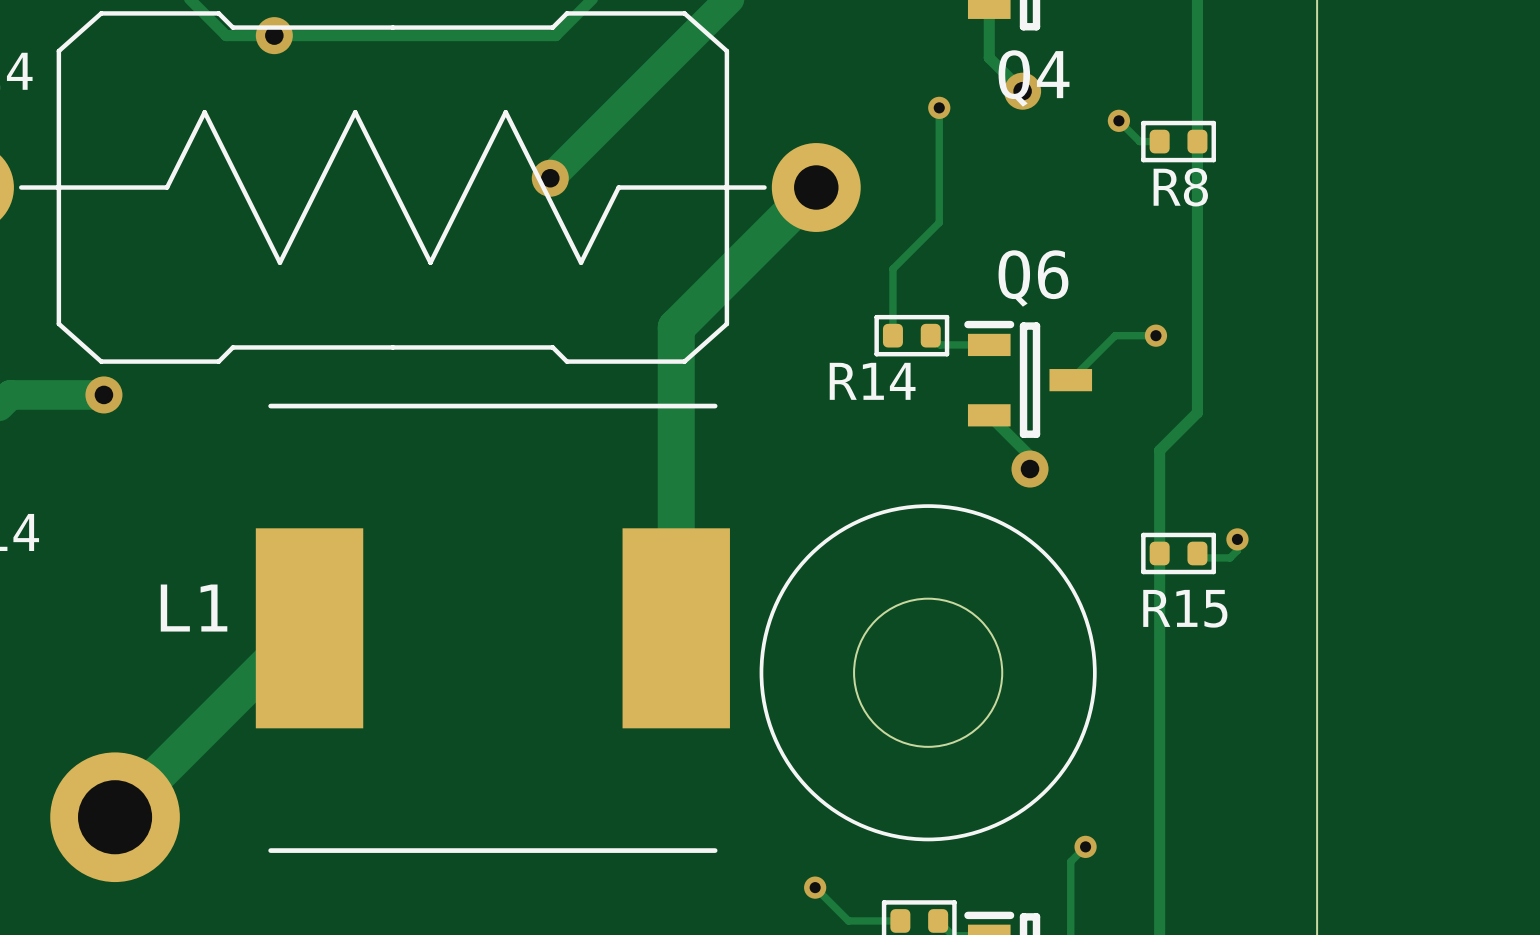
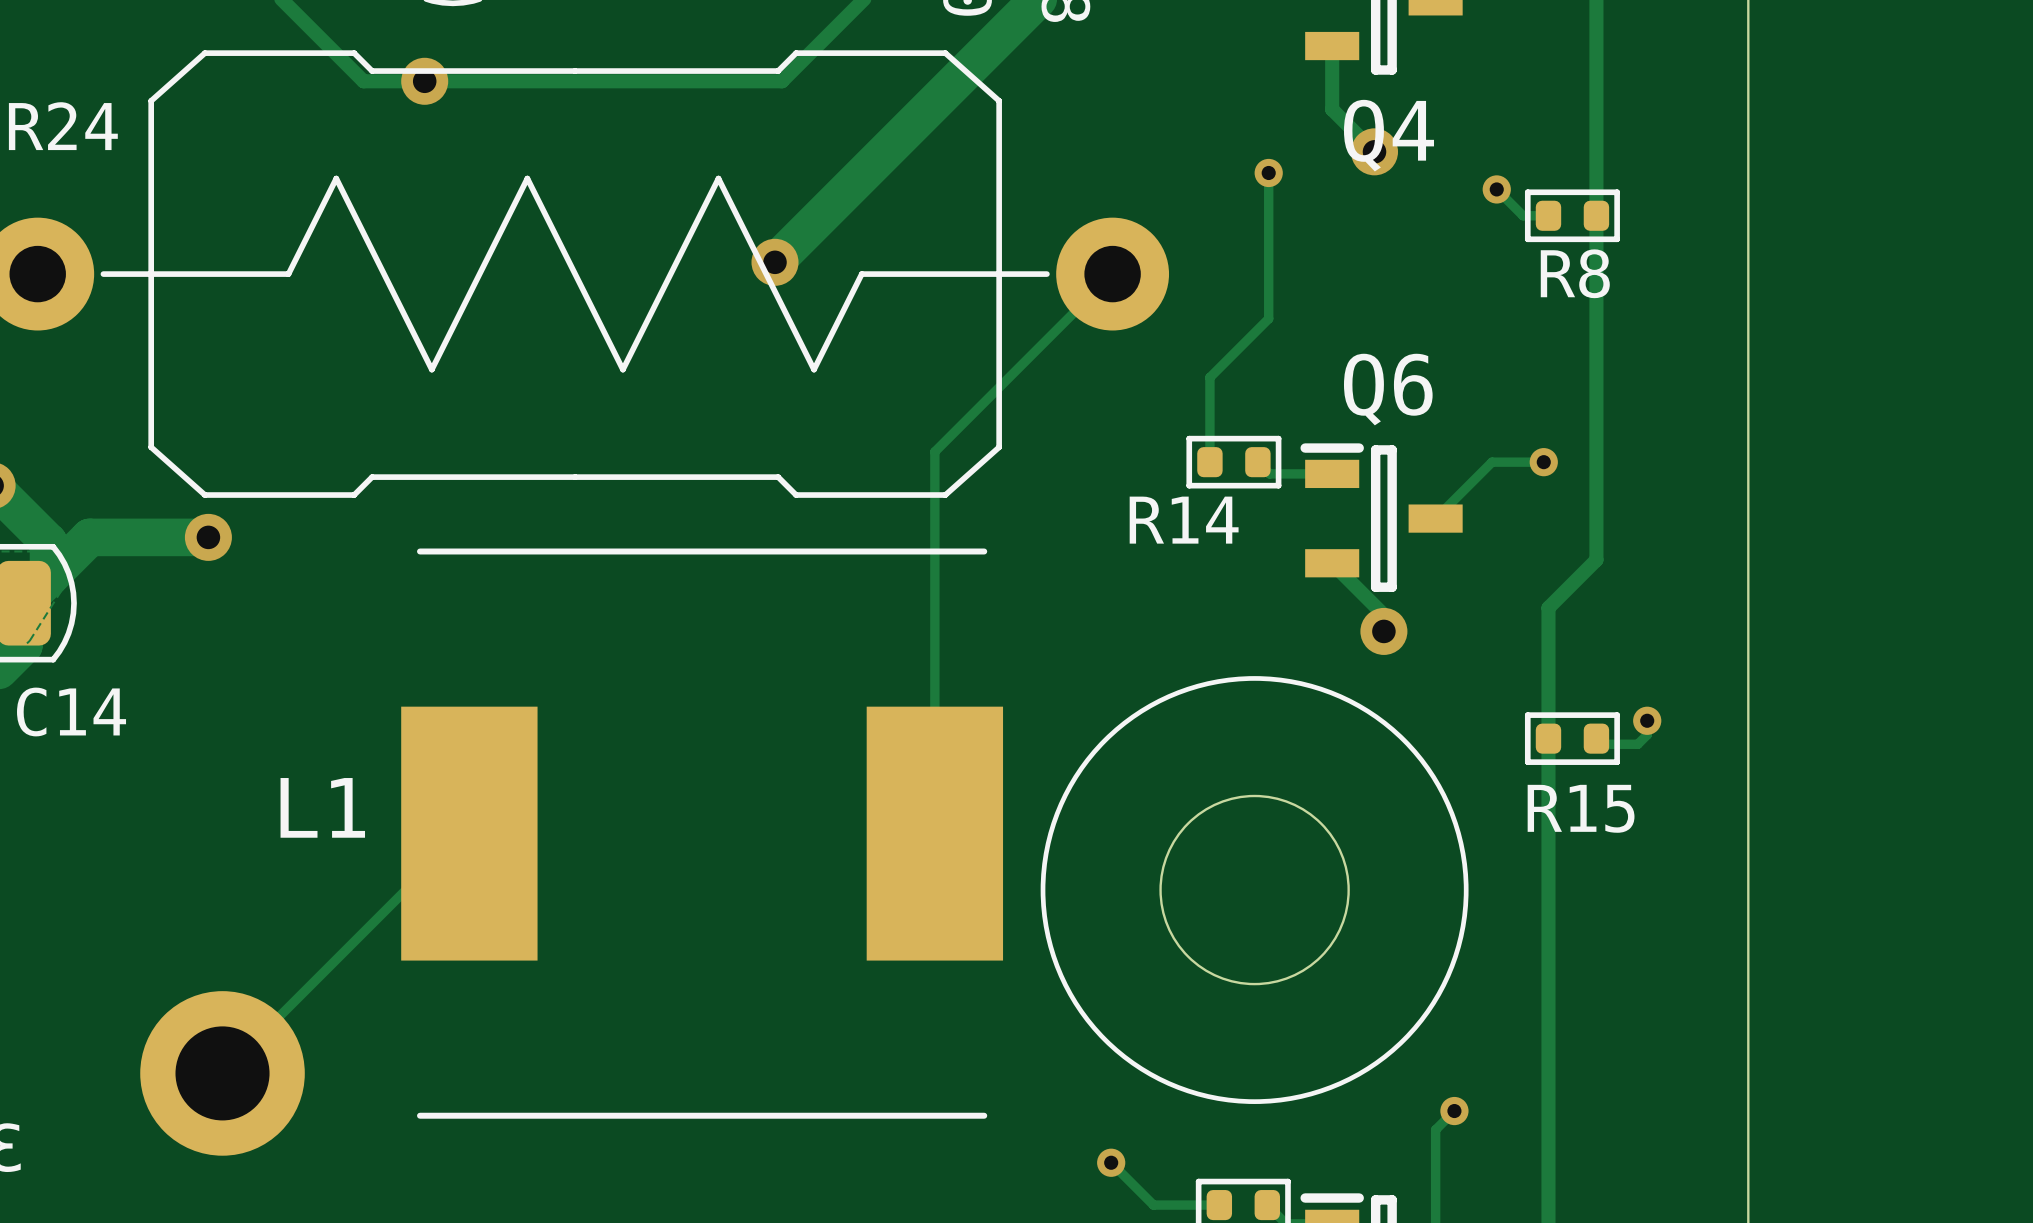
track width: thick (816, 187) (676, 327) (676, 628) -> thin (1112, 274) (934, 451) (934, 833)
track width: thick (303, 628) (115, 817) -> thin (462, 833) (222, 1073)

